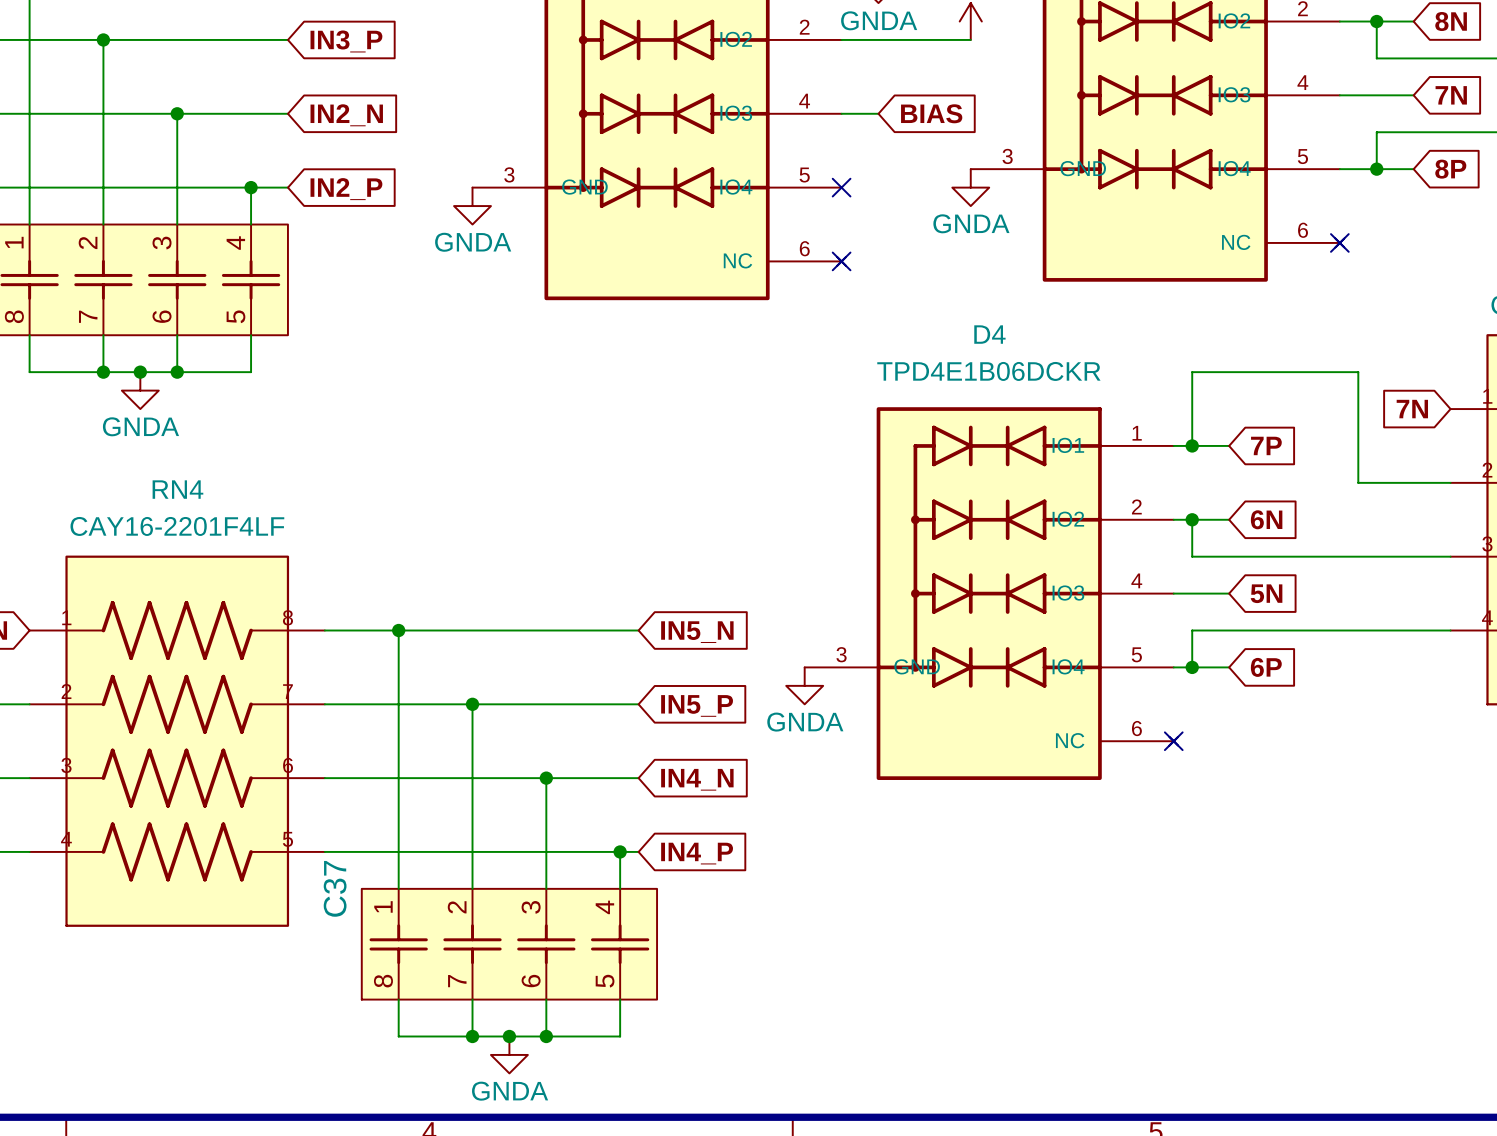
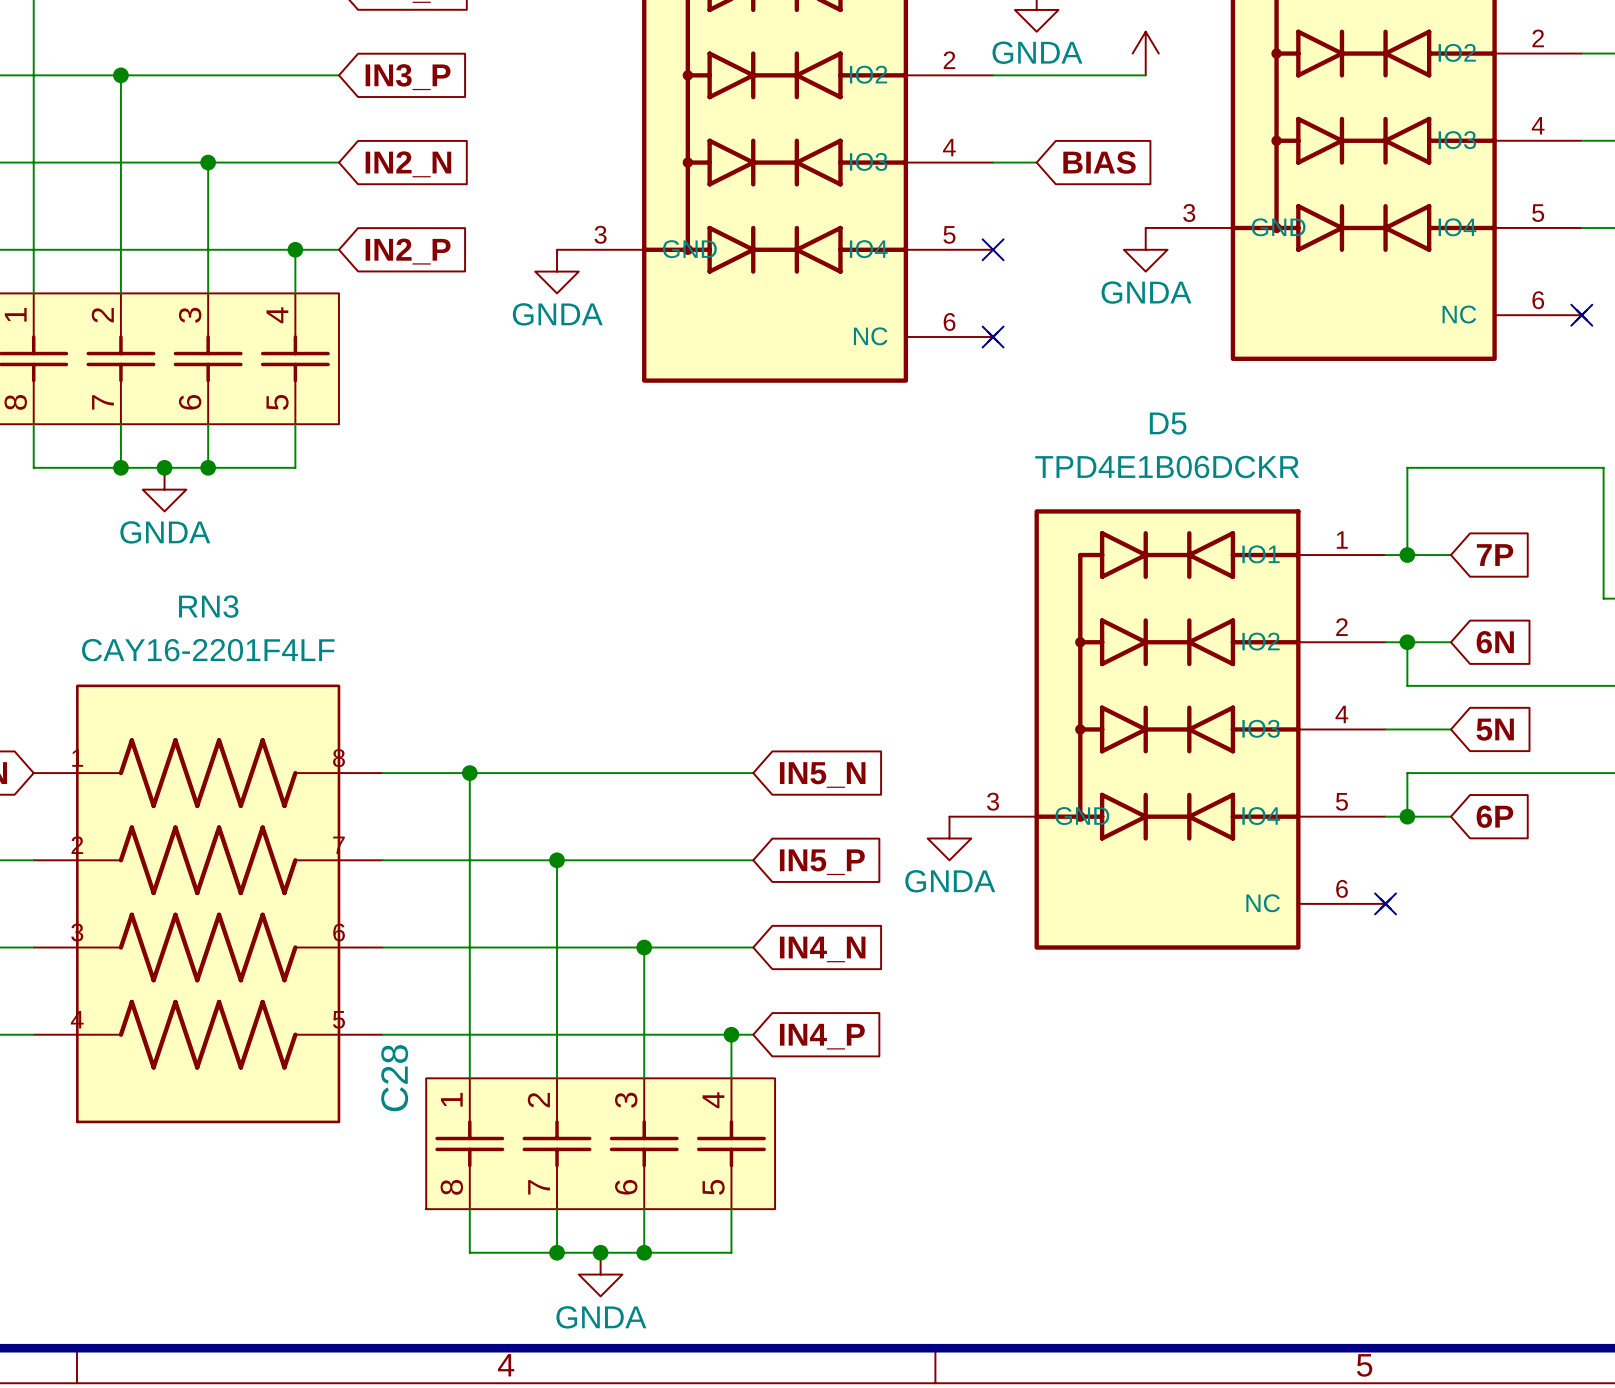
D4 name: D4 (989, 334) -> D5 (1168, 423)
RN4 name: RN4 (177, 489) -> RN3 (208, 606)
C37 name: C37 (335, 888) -> C28 (394, 1078)

